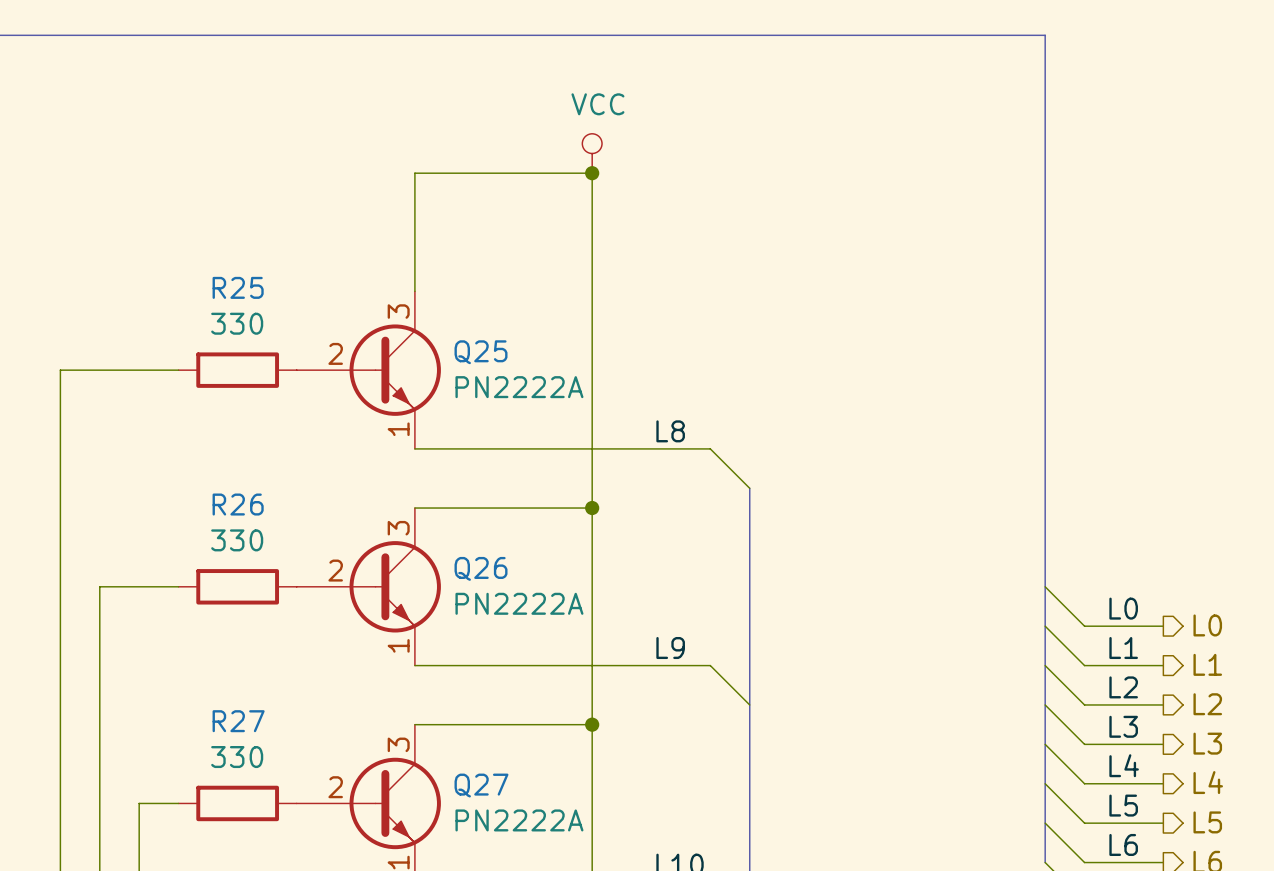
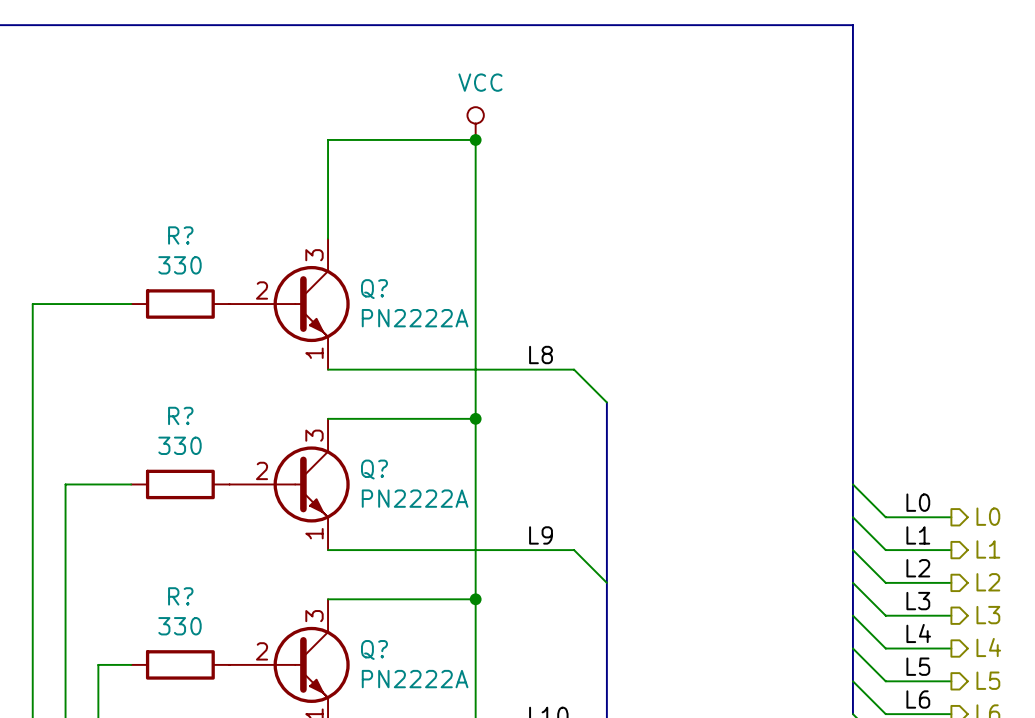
R25 name: R25 (238, 287) -> R? (180, 235)
Q25 name: Q25 (481, 352) -> Q? (374, 289)
R26 name: R26 (238, 504) -> R? (180, 415)
Q26 name: Q26 (481, 568) -> Q? (374, 469)
R27 name: R27 (238, 721) -> R? (180, 596)
Q27 name: Q27 (481, 785) -> Q? (374, 649)

